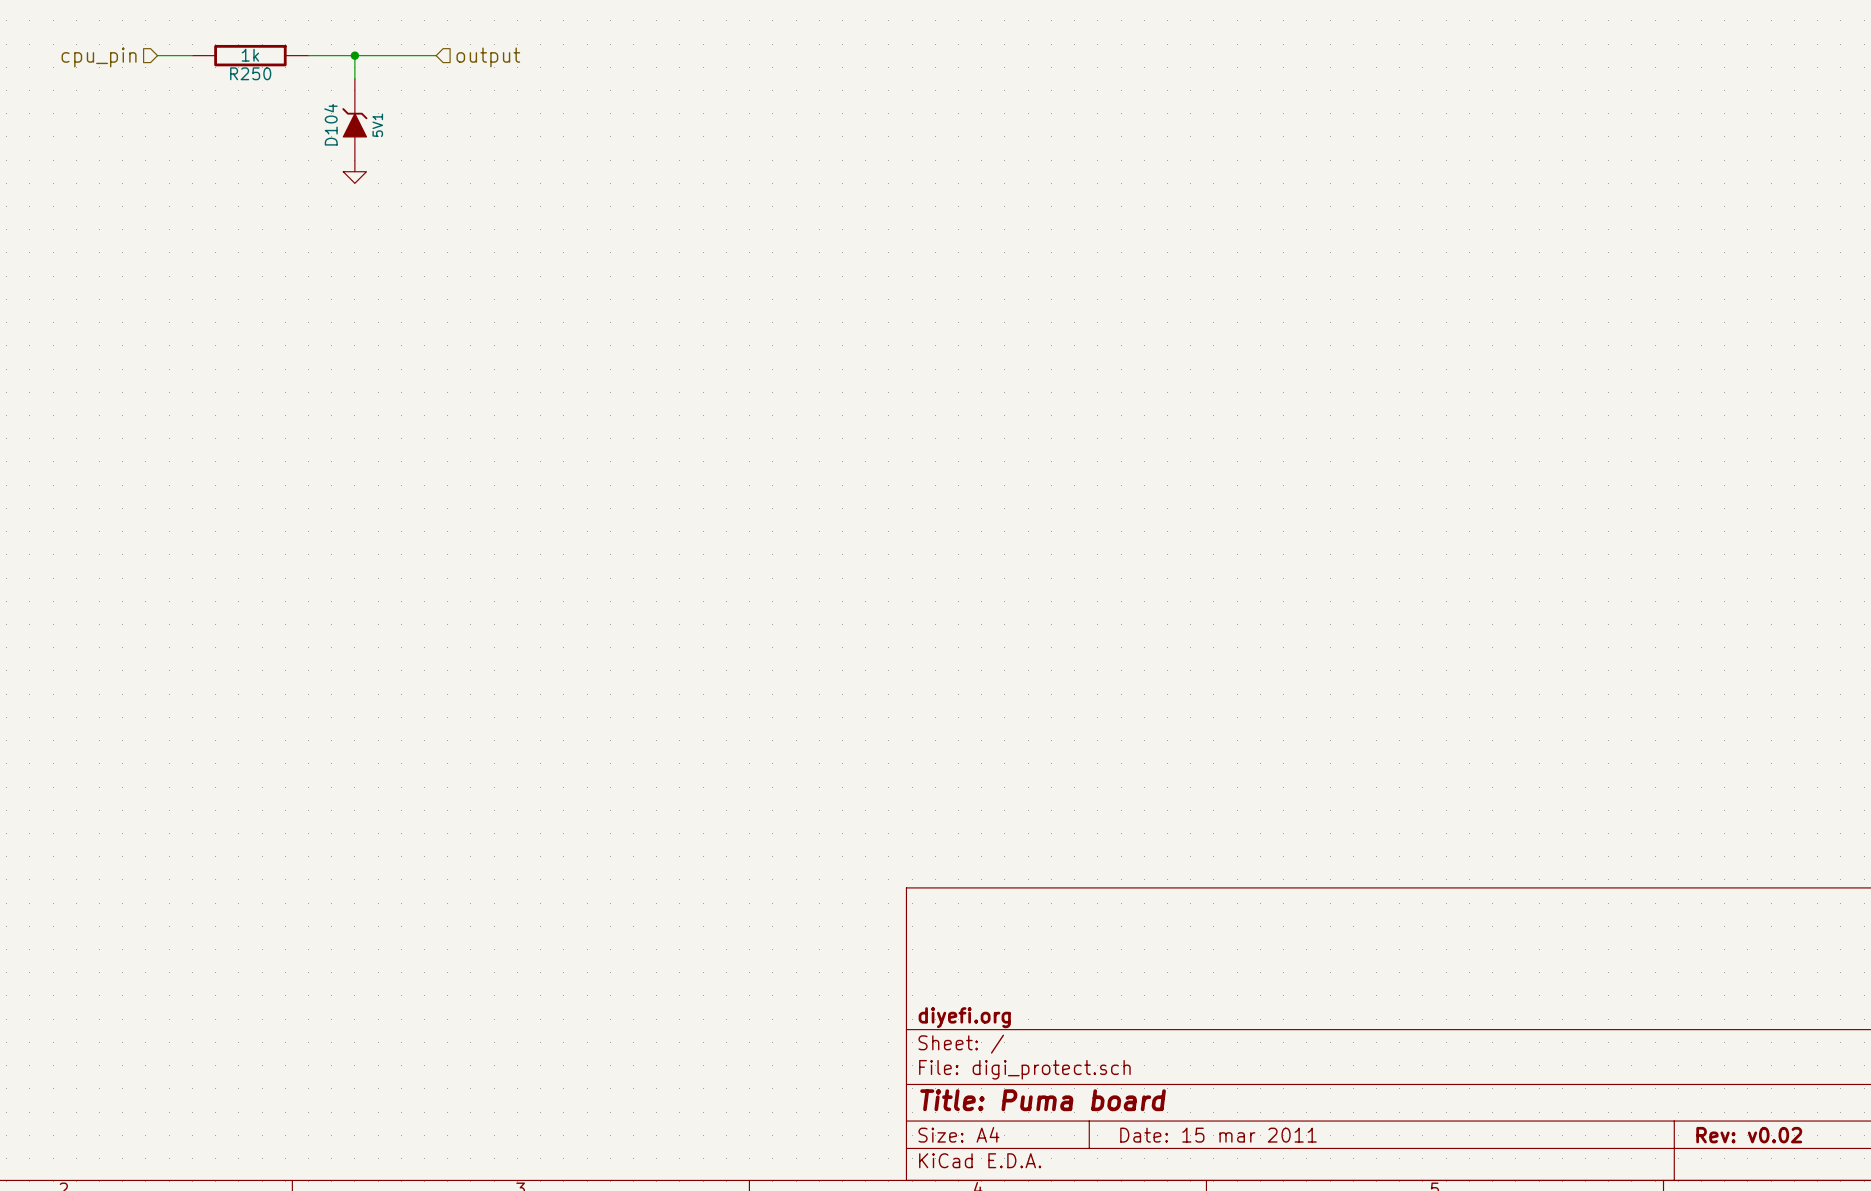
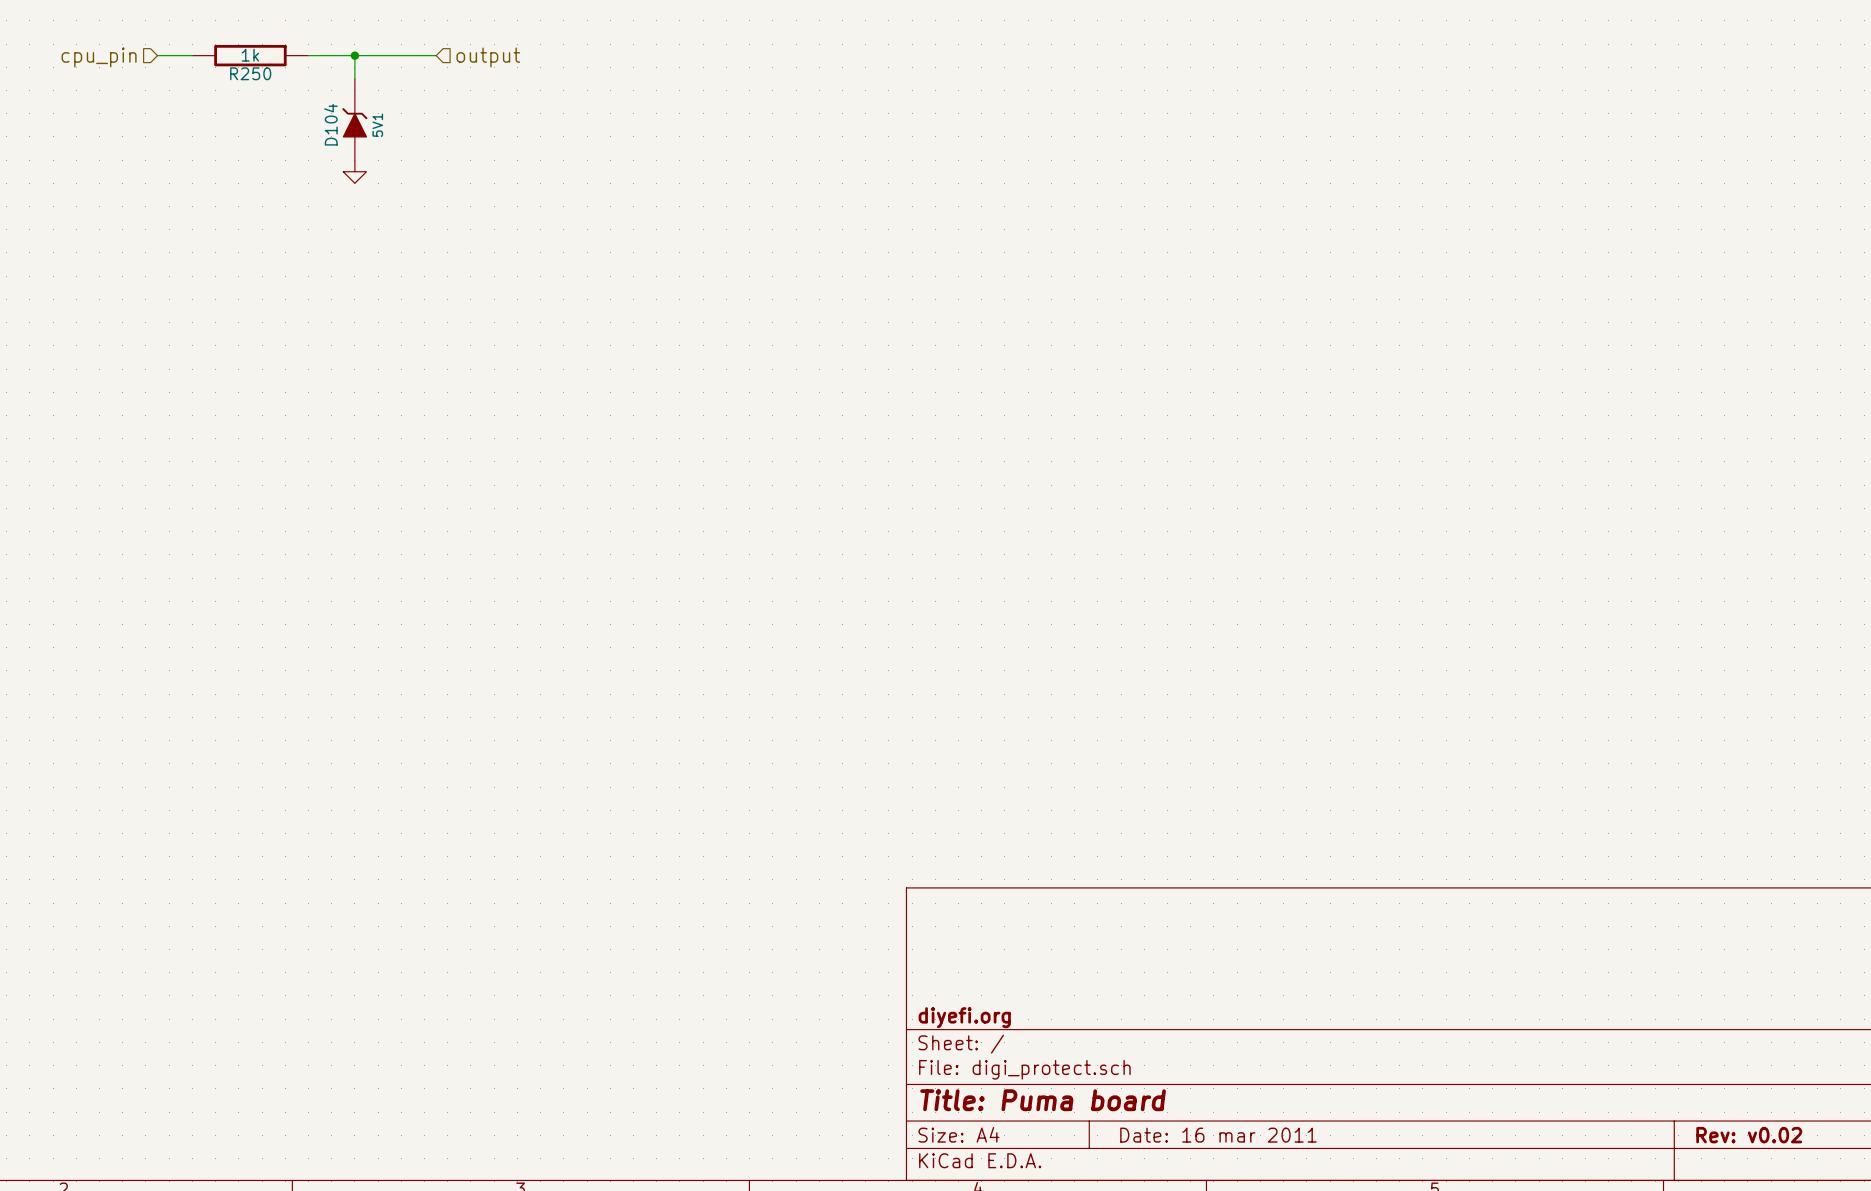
title block: Date: 15 mar 2011 (1218, 1135) -> Date: 16 mar 2011 (1218, 1135)

